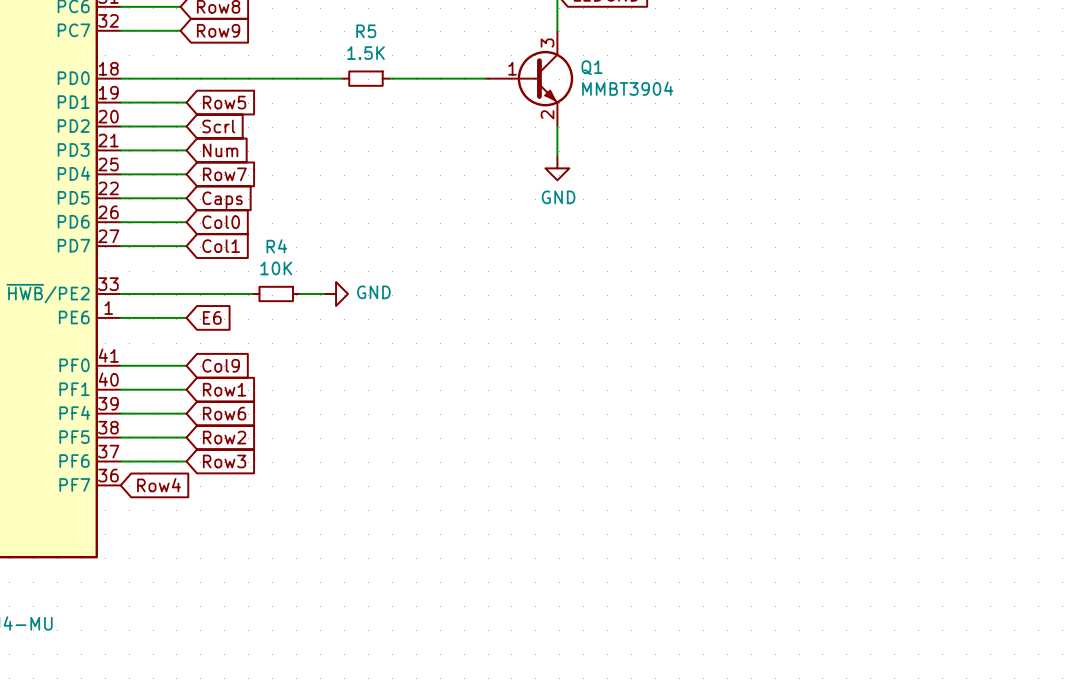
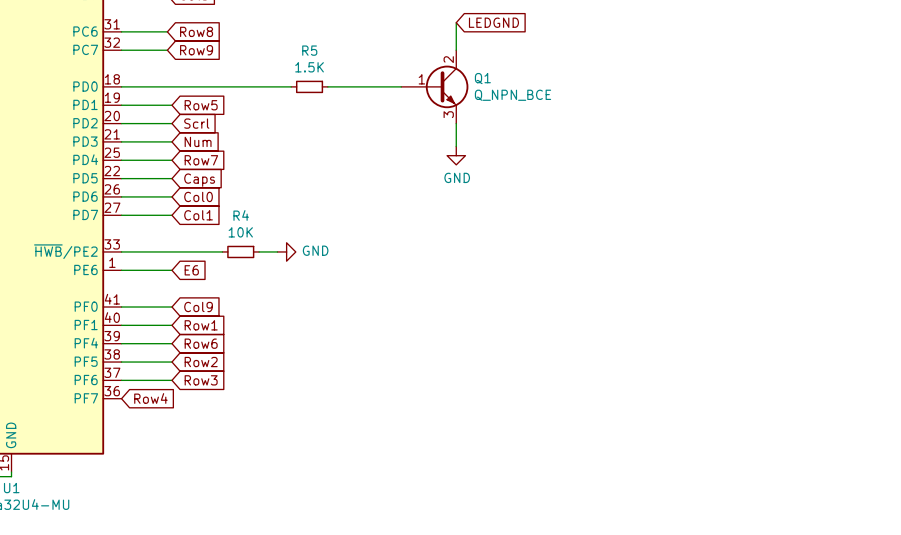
Q1 pin number: 3 (547, 43) -> 2 (448, 59)
Q1 value: MMBT3904 (627, 88) -> Q_NPN_BCE (512, 95)
Q1 pin number: 2 (547, 114) -> 3 (448, 114)

